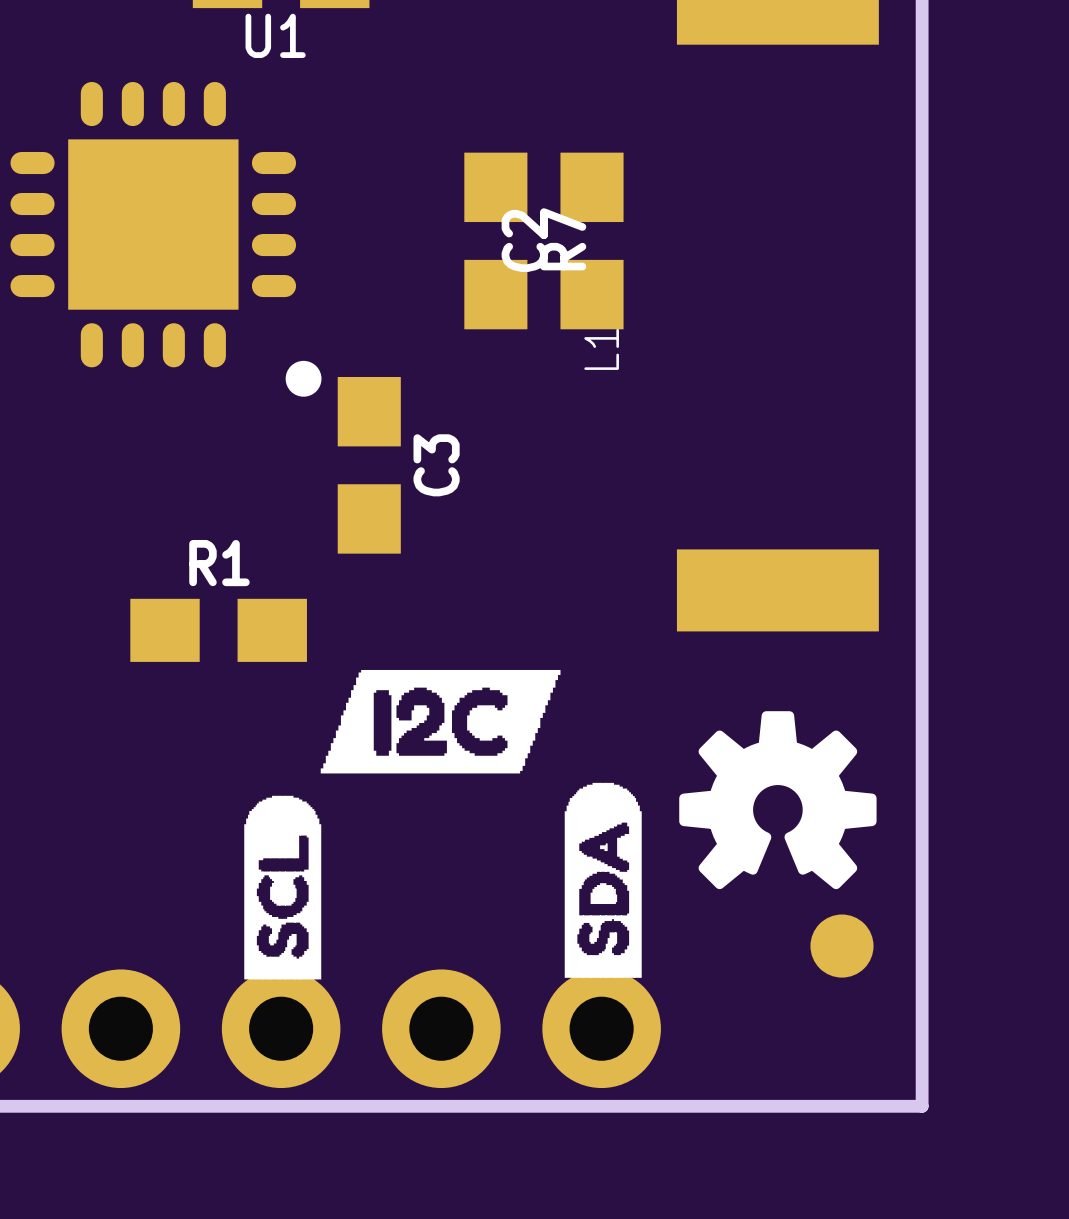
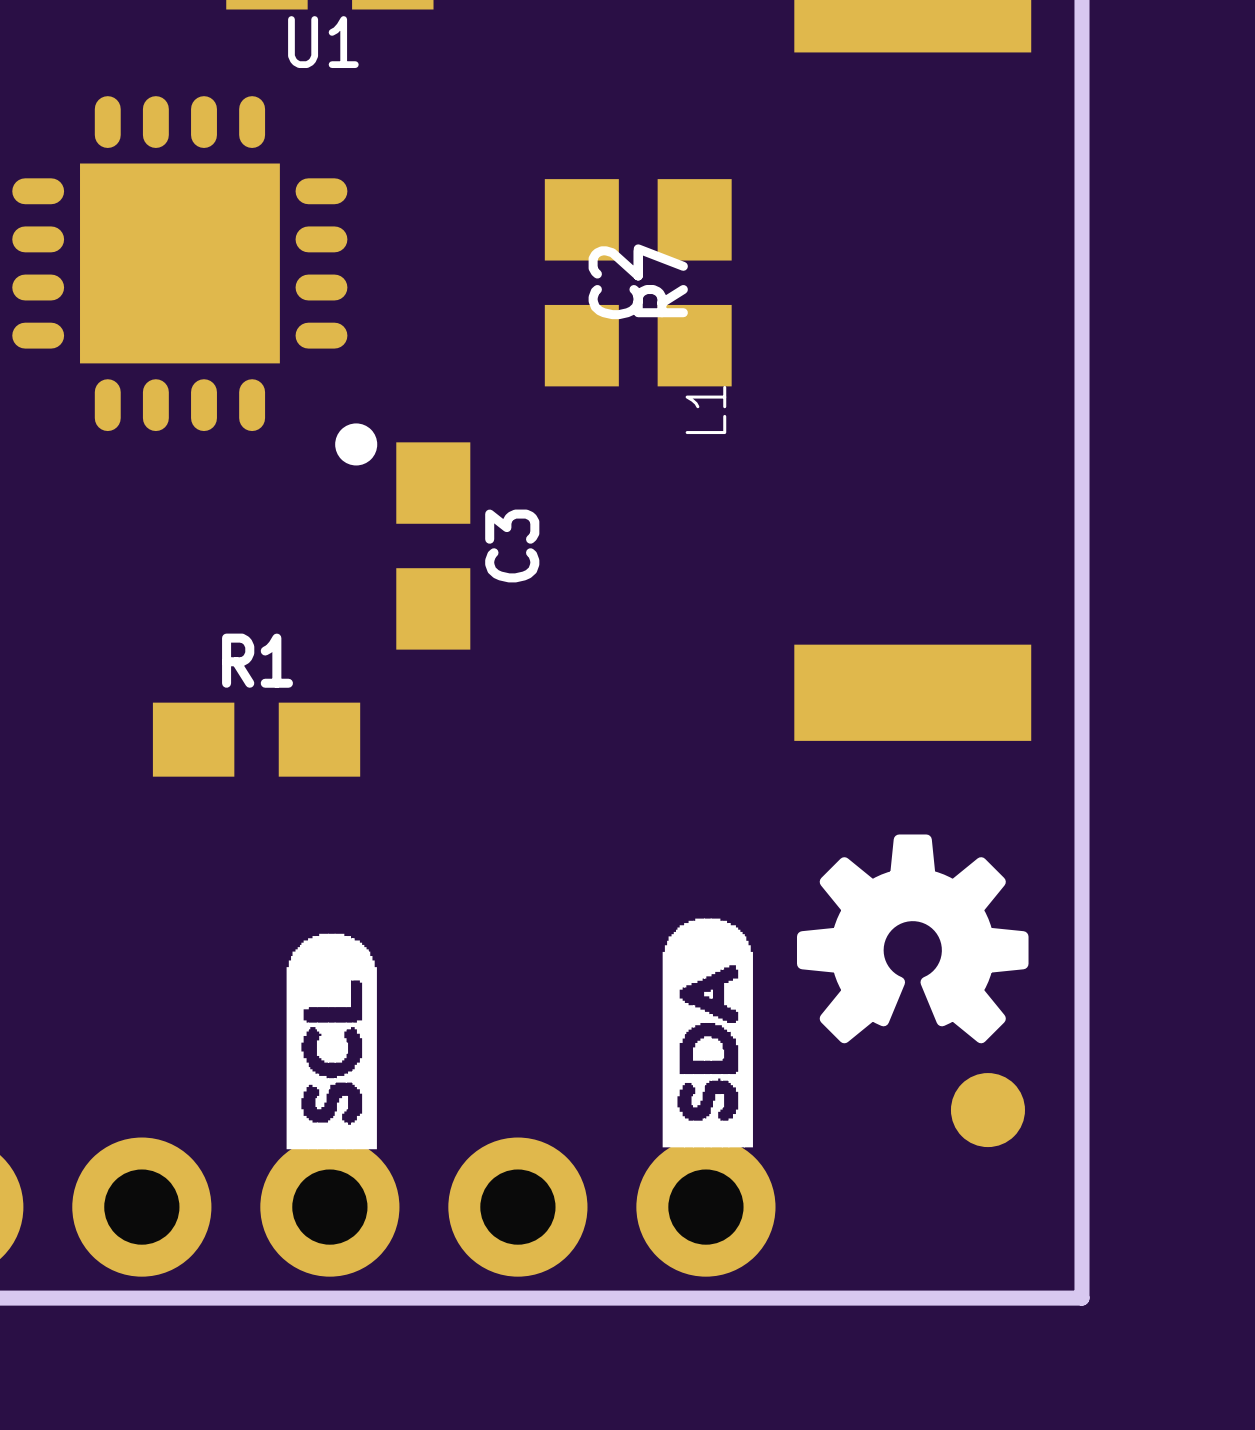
drawing: [320, 669, 561, 774] -> none

